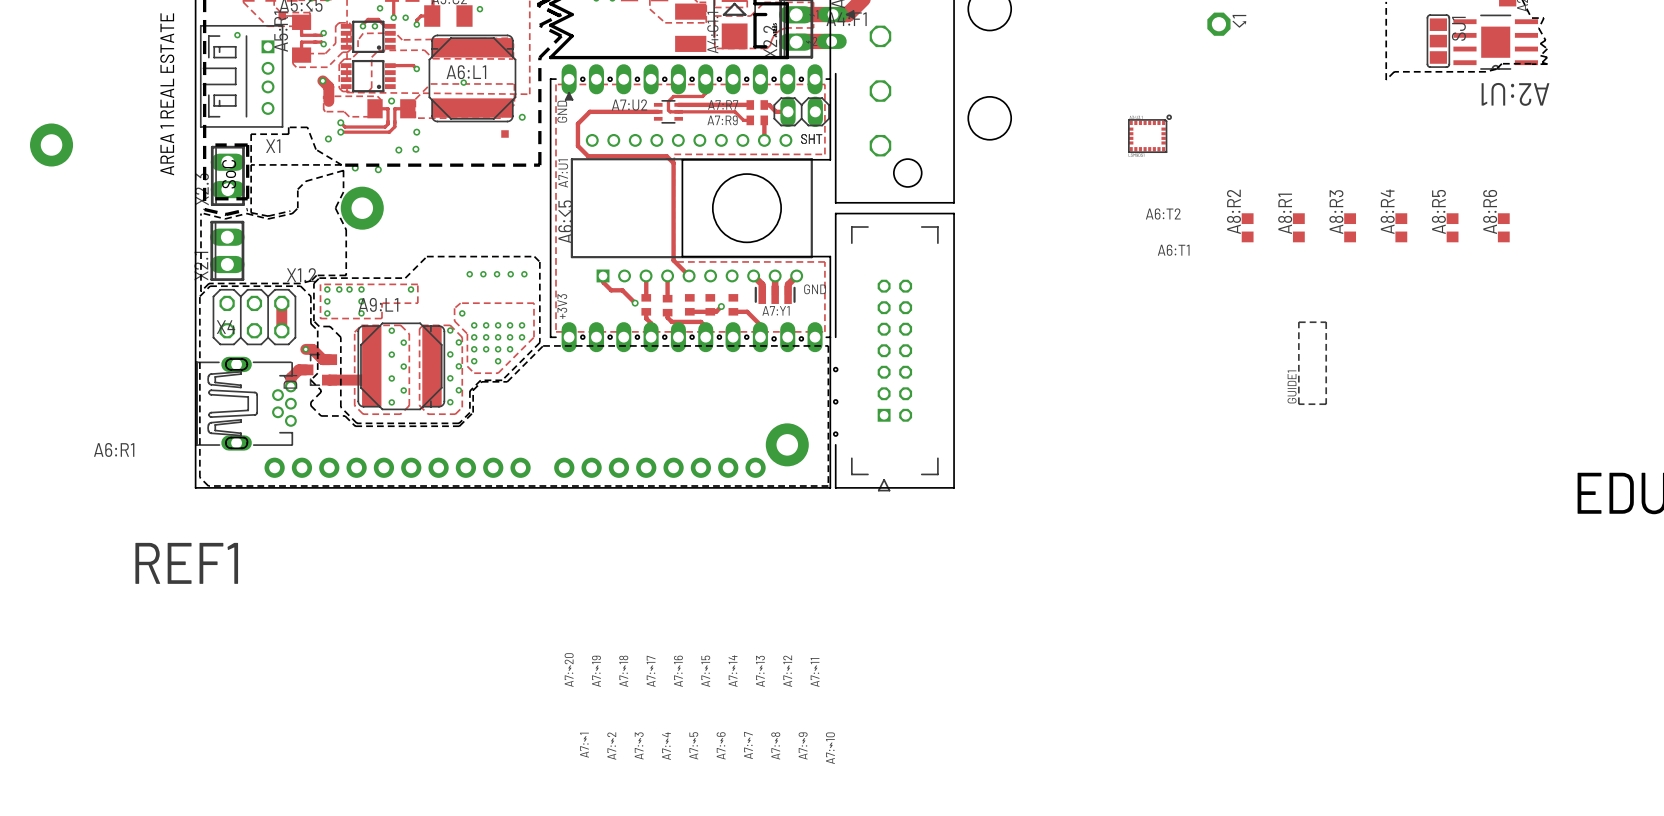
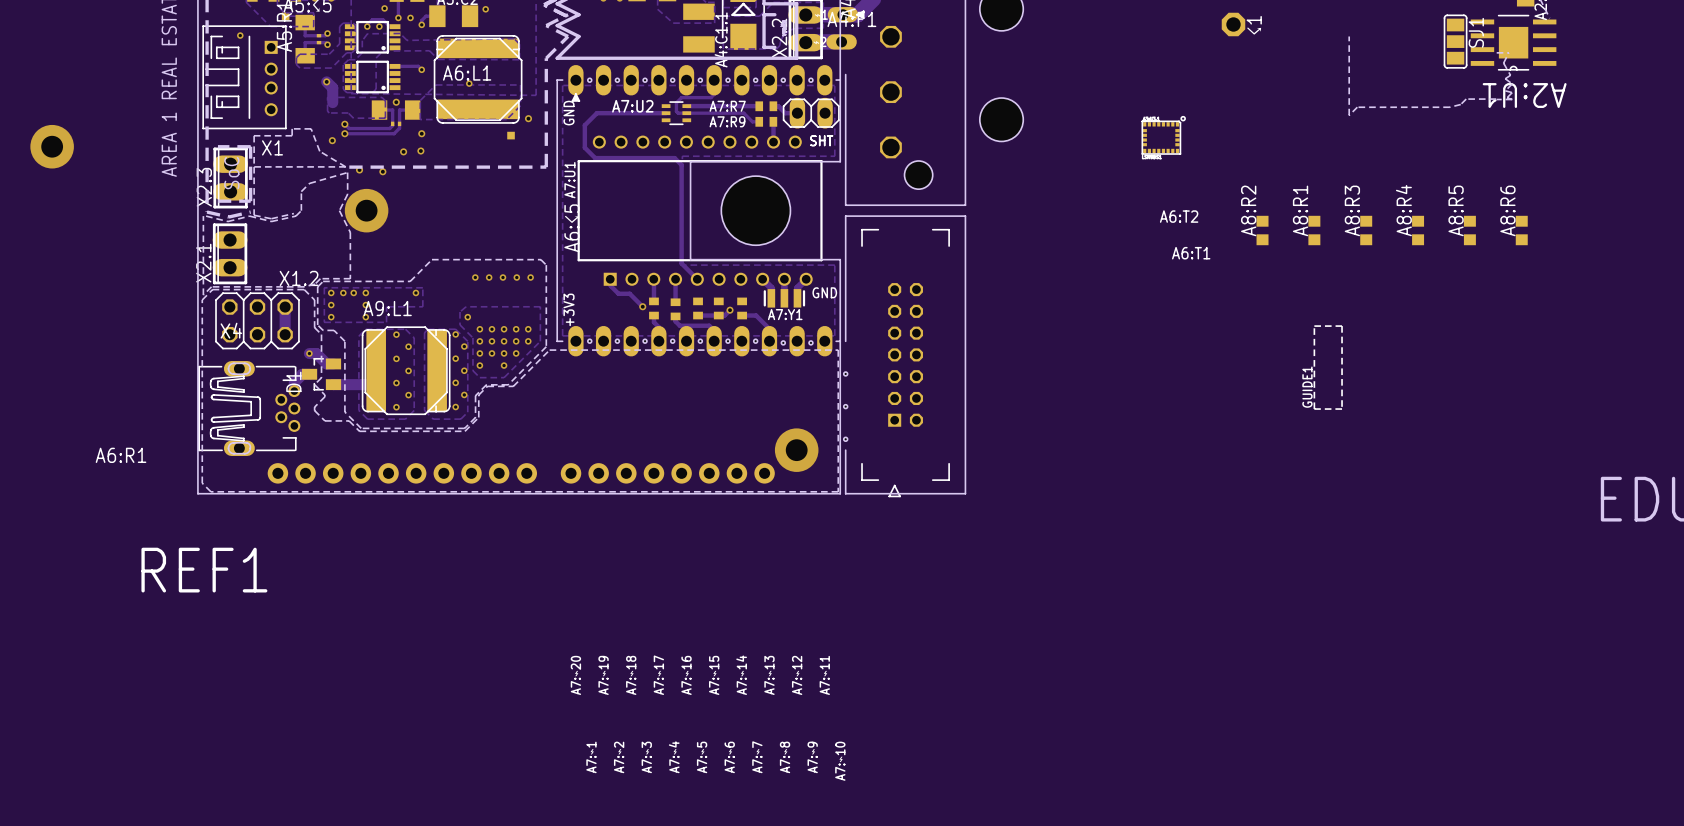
board edge: (1386, 1) (1386, 79) (1394, 71) (1485, 71) (1496, 69) (1501, 63) (1531, 63) -> (1349, 36) (1349, 115) (1357, 107) (1449, 107) (1460, 104) (1466, 99) (1496, 99)
board edge: (1531, 18) (1543, 18) (1538, 28) (1545, 40) (1540, 43) (1547, 48) (1540, 55) (1547, 57) (1542, 62) (1547, 64) (1531, 64) -> (1496, 52) (1508, 52) (1503, 63) (1510, 75) (1505, 78) (1512, 83) (1505, 90) (1512, 92) (1507, 97) (1512, 99) (1496, 99)

